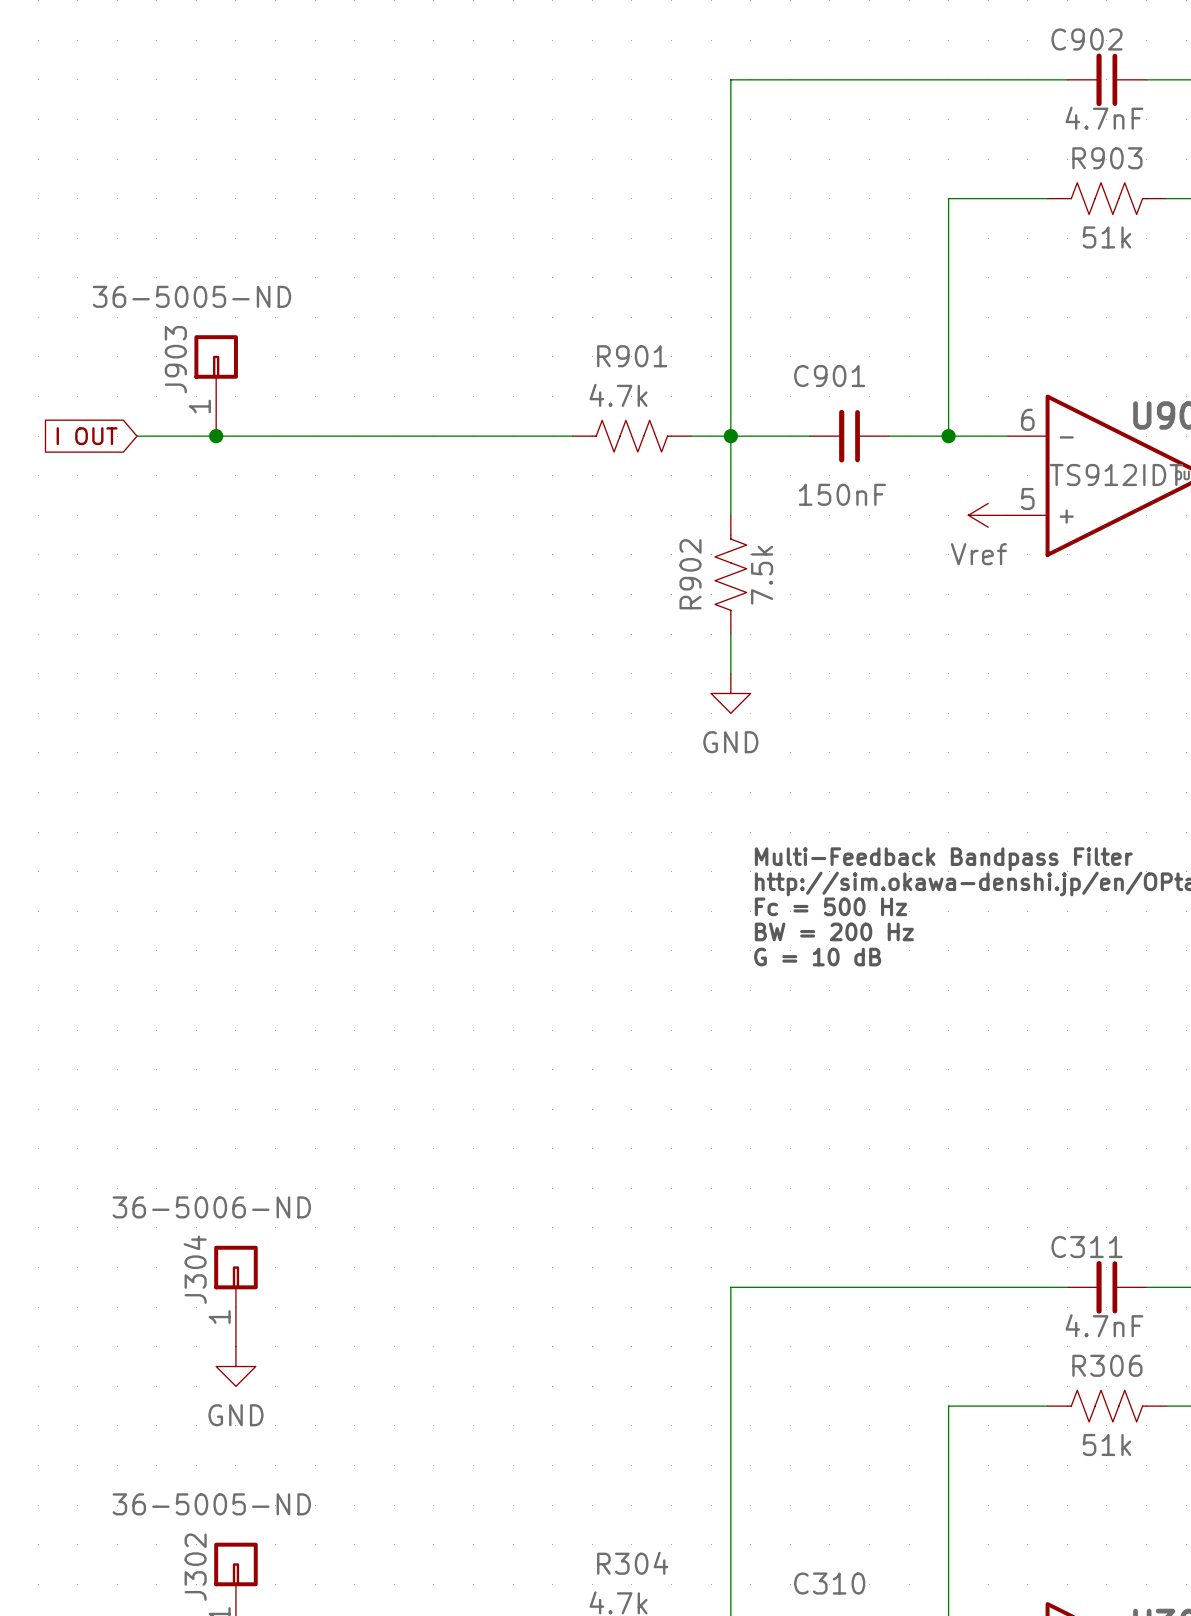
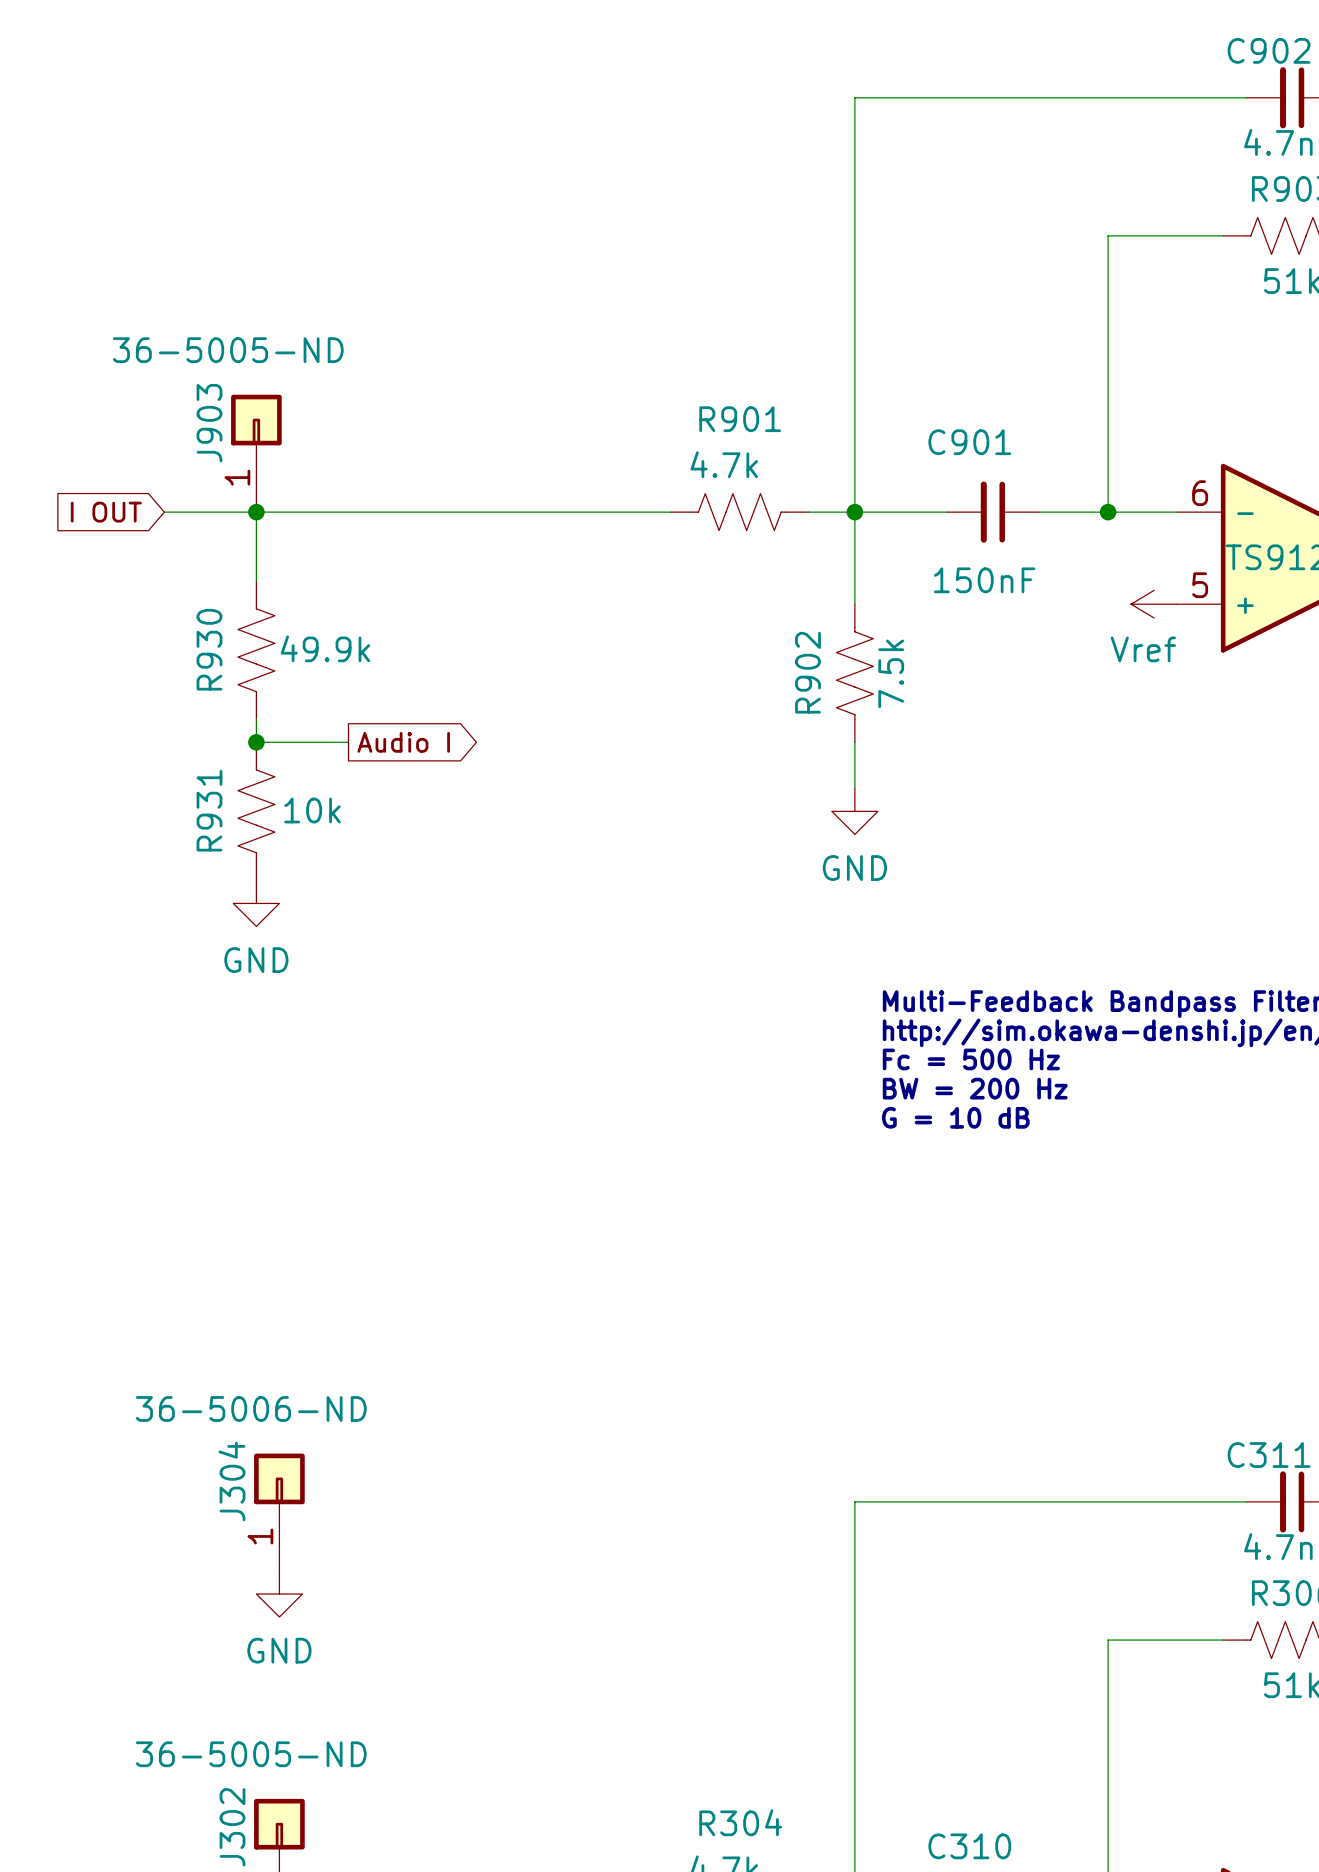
wire: none -> (256, 512) (256, 581)
R930: none -> 49.9k (256, 650)
wire: none -> (256, 719) (256, 742) (348, 742)
junction: none -> (256, 742)
global label: none -> Audio I (403, 742)
R931: none -> 10k (256, 811)
power symbol: none -> GND (256, 903)

